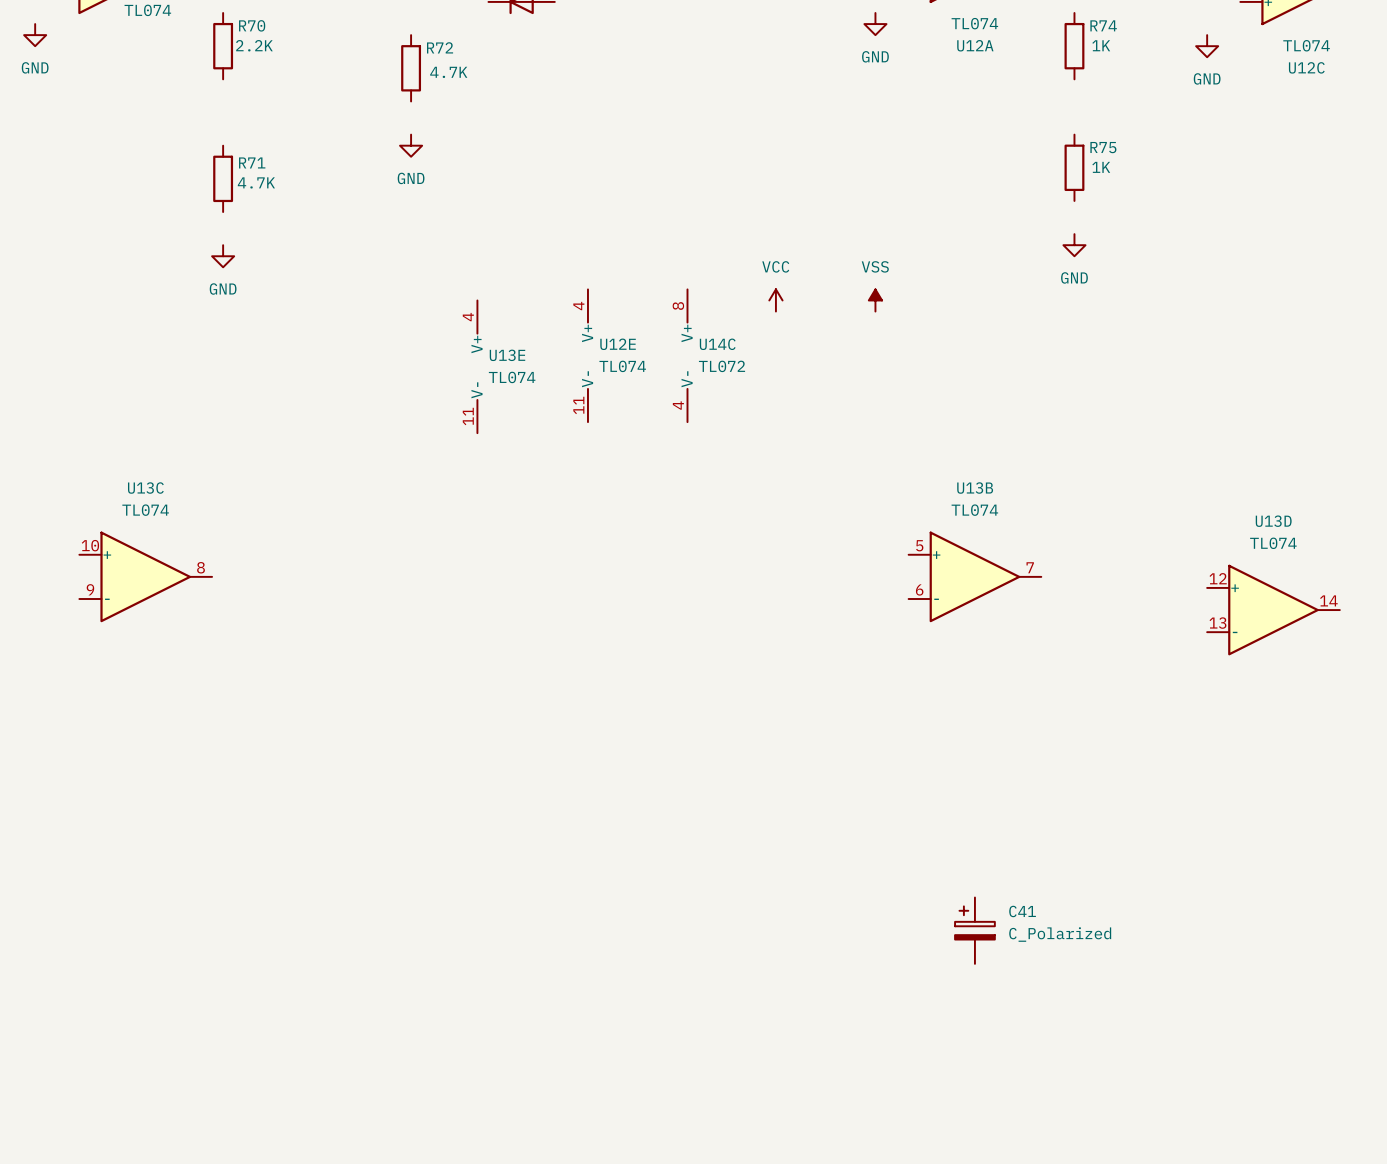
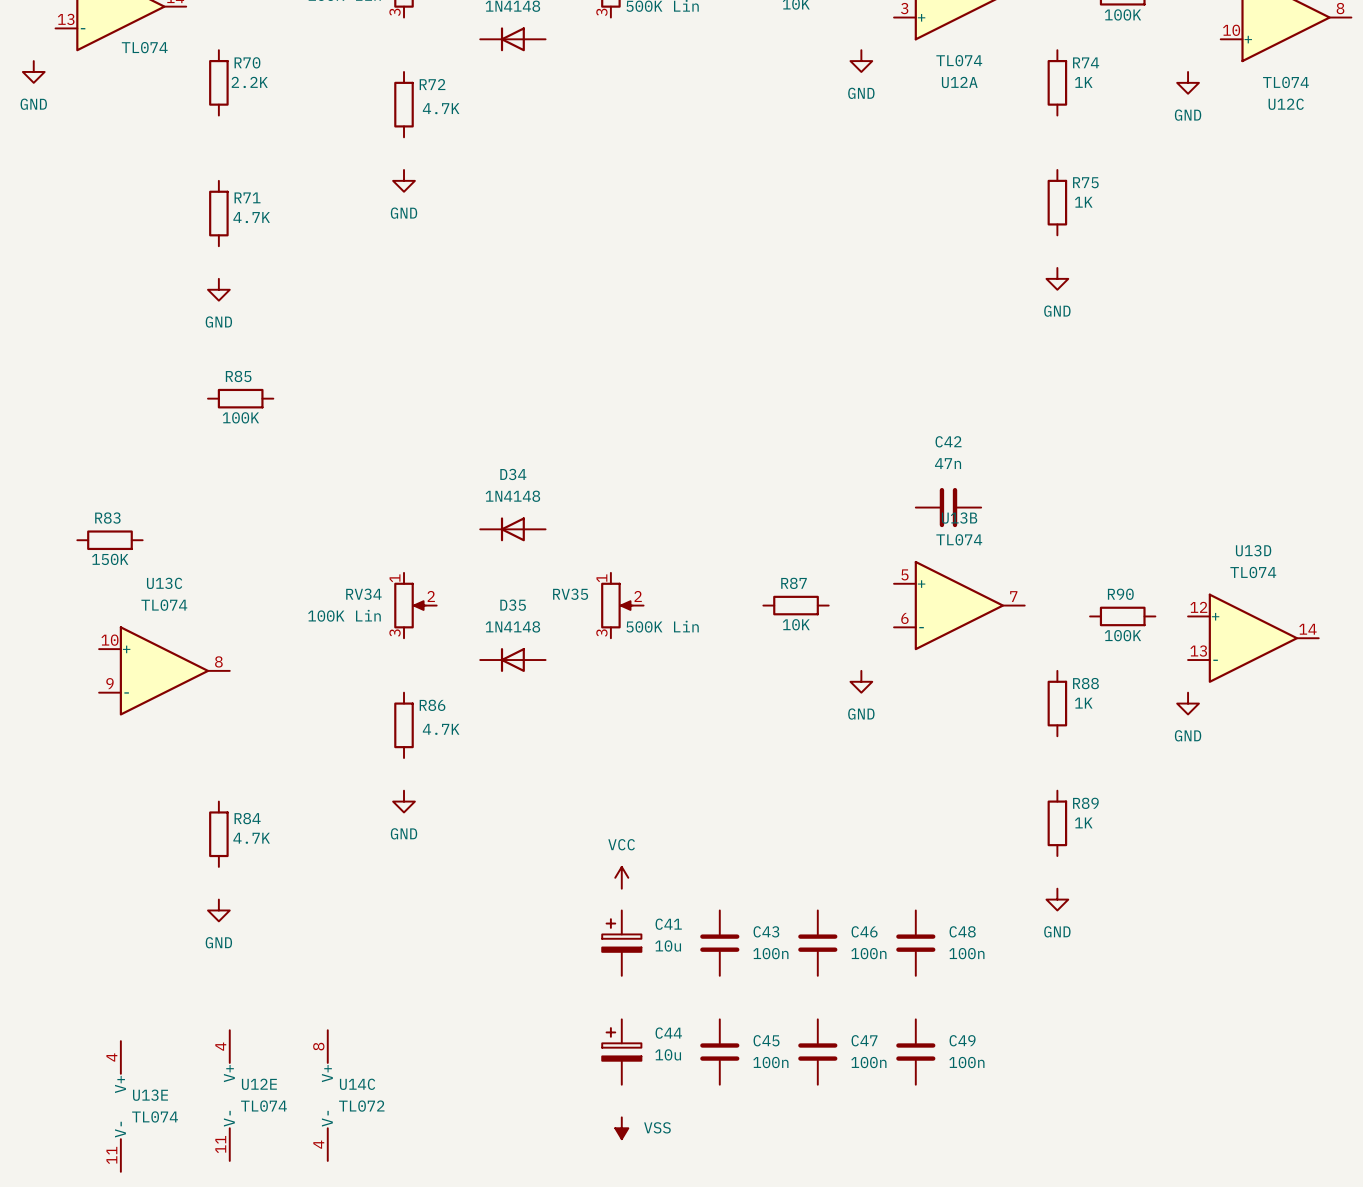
power symbol: VCC (775, 300) -> none
power symbol: VSS (875, 300) -> none
U12E position: (587, 355) -> (229, 1095)
U14C position: (687, 355) -> (327, 1095)
R85: none -> 100K (240, 398)
U13E position: (477, 366) -> (120, 1106)
C42: none -> 47n (948, 507)
D34: none -> 1N4148 (512, 529)
R83: none -> 150K (109, 540)
U13C position: (145, 576) -> (164, 670)
RV34: none -> 100K Lin (415, 605)
RV35: none -> 500K Lin (622, 605)
R87: none -> 10K (796, 605)
R90: none -> 100K (1122, 616)
D35: none -> 1N4148 (512, 660)
power symbol: none -> GND (861, 681)
R88: none -> 1K (1057, 703)
power symbol: none -> GND (1188, 703)
R86: none -> 4.7K (404, 725)
power symbol: none -> GND (404, 801)
R89: none -> 1K (1057, 823)
R84: none -> 4.7K (218, 834)
power symbol: none -> VCC (621, 877)
power symbol: none -> GND (1057, 899)
power symbol: none -> GND (218, 910)
C43: none -> 100n (719, 943)
C46: none -> 100n (817, 943)
C48: none -> 100n (915, 943)
C41 position: (974, 930) -> (621, 943)
C41 value: C_Polarized (1060, 934) -> 10u (668, 946)
C44: none -> 10u (621, 1052)
C45: none -> 100n (719, 1052)
C47: none -> 100n (817, 1052)
C49: none -> 100n (915, 1052)
power symbol: none -> VSS (621, 1128)

